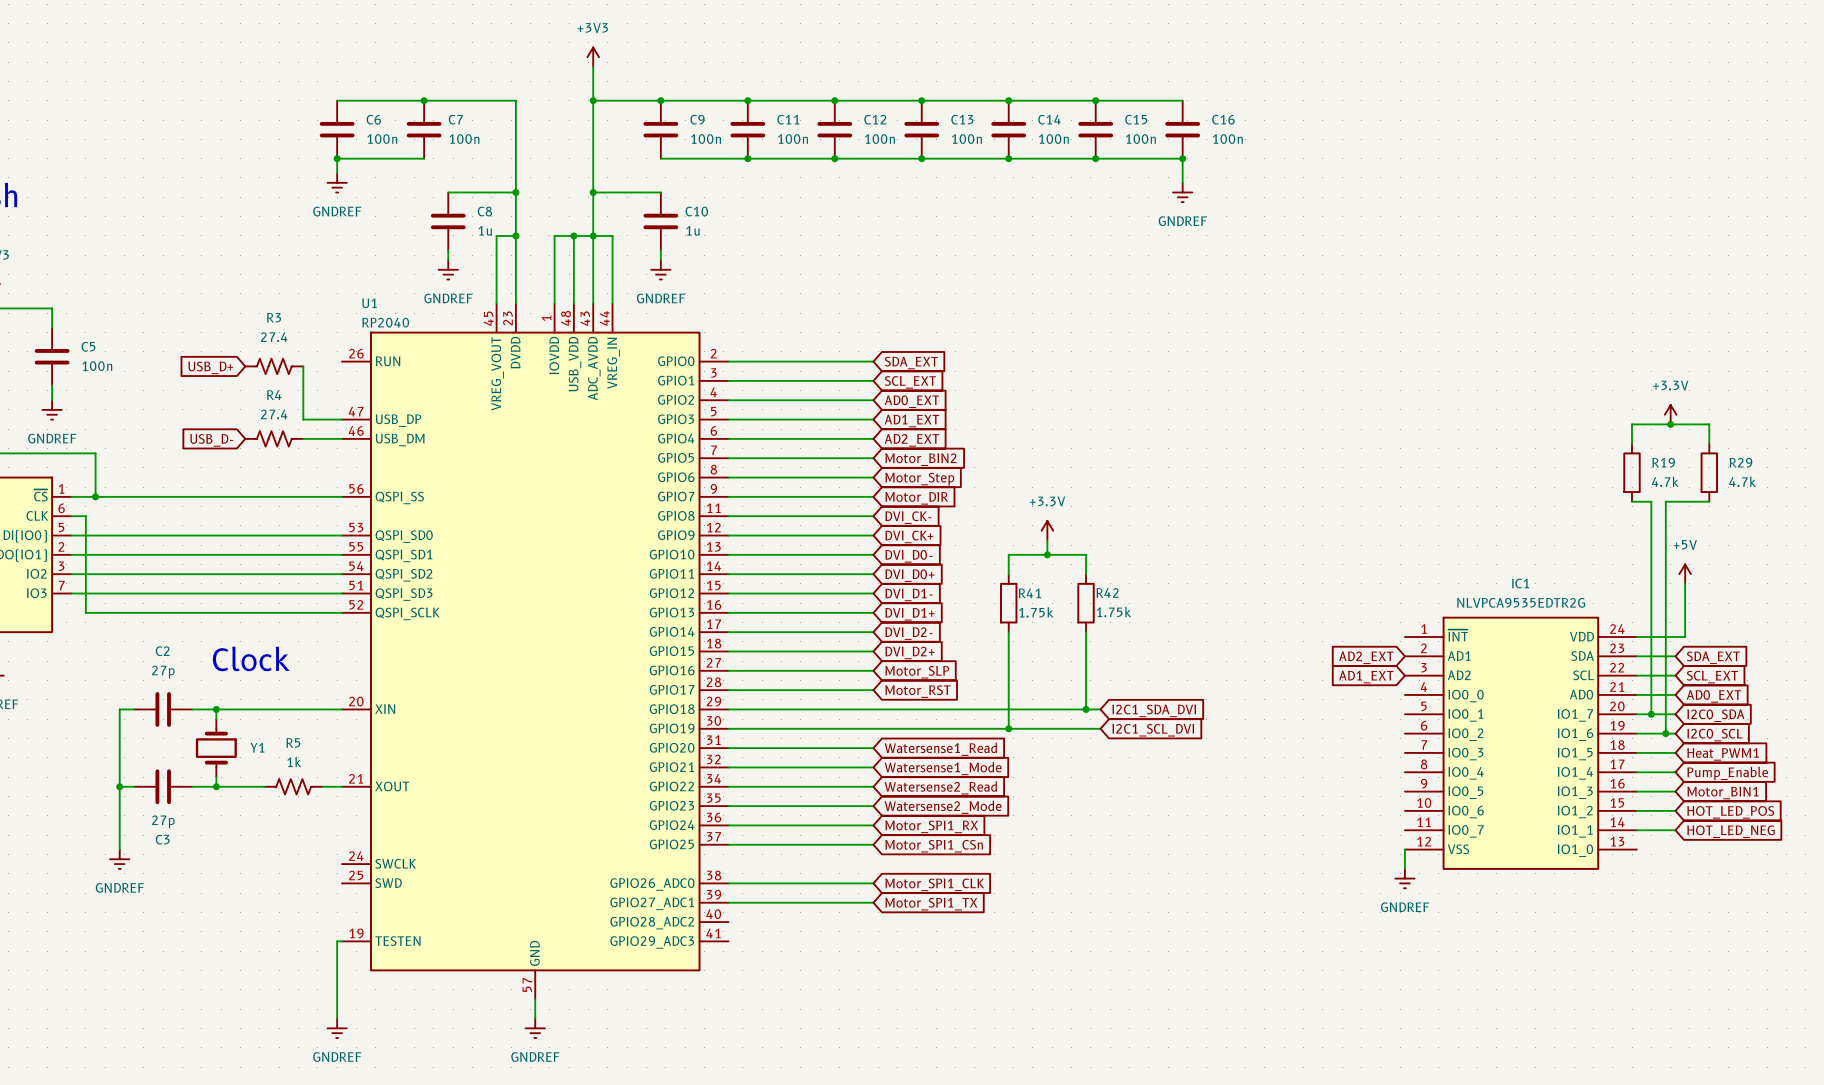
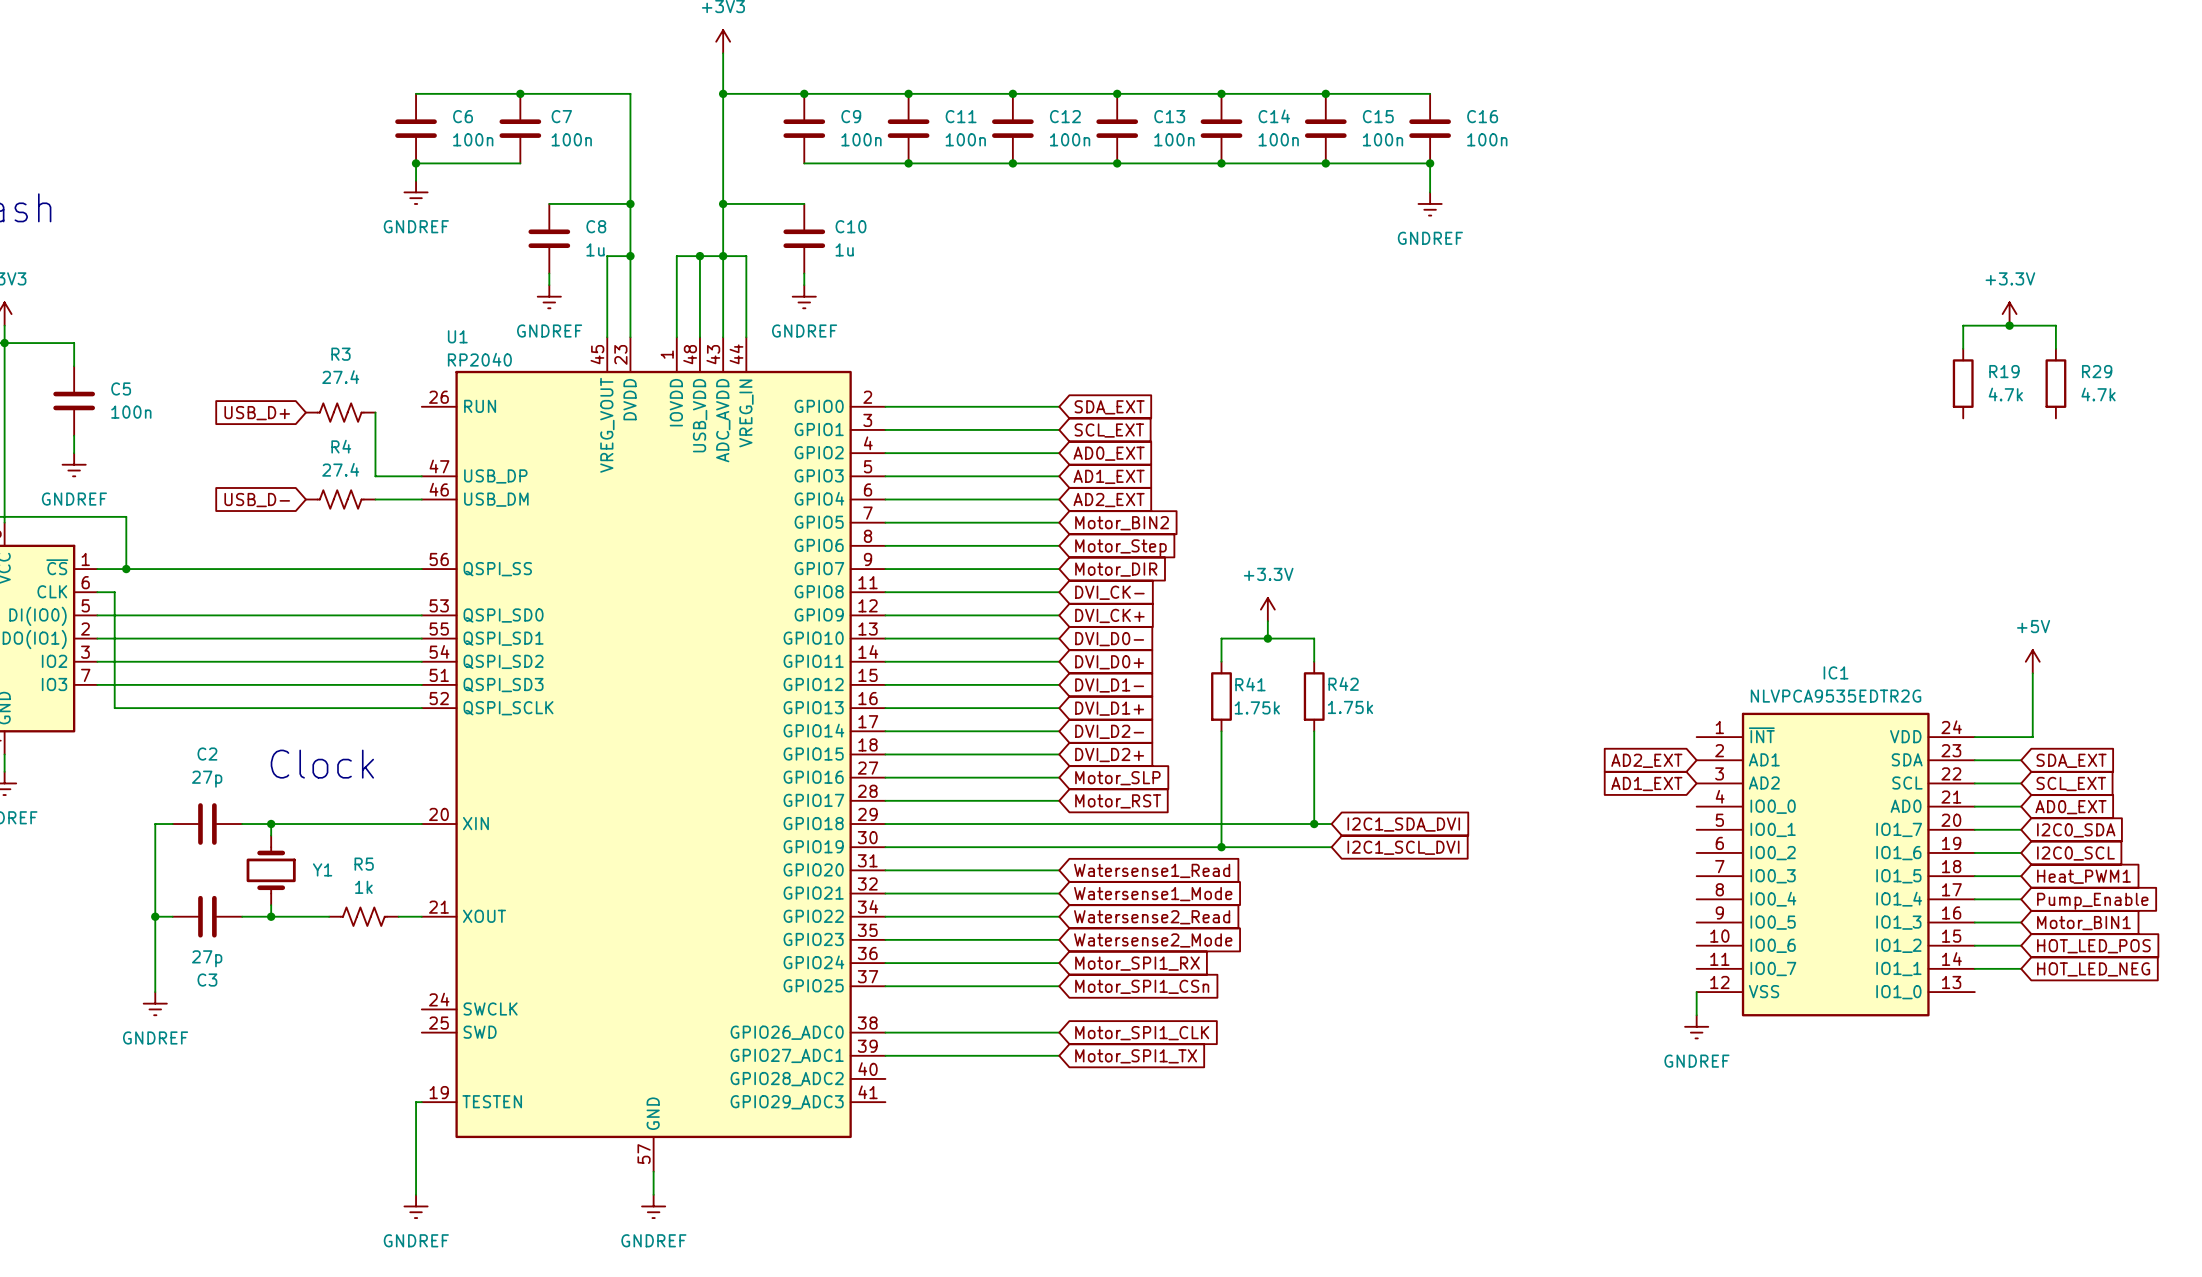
junction: none -> (2009, 325)
power symbol position: +3.3V (1670, 414) -> +3.3V (2009, 314)
junction: (1670, 424) -> none
wire: (1632, 443) (1632, 424) (1709, 424) (1709, 443) -> (1963, 348) (1963, 325) (2055, 325) (2055, 348)
R19 position: (1632, 472) -> (1963, 383)
R29 position: (1709, 472) -> (2055, 383)
wire: (1632, 501) (1651, 501) (1651, 714) -> none
wire: (1709, 501) (1665, 501) (1665, 733) -> none
junction: (1651, 714) -> none
junction: (1665, 733) -> none

